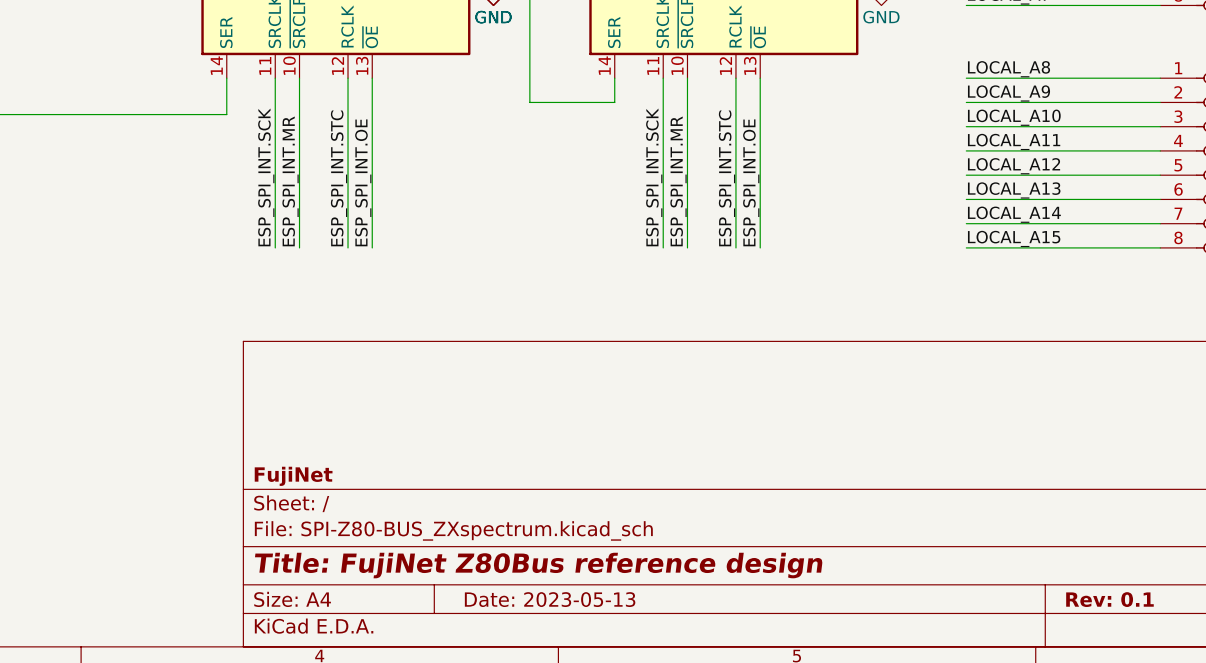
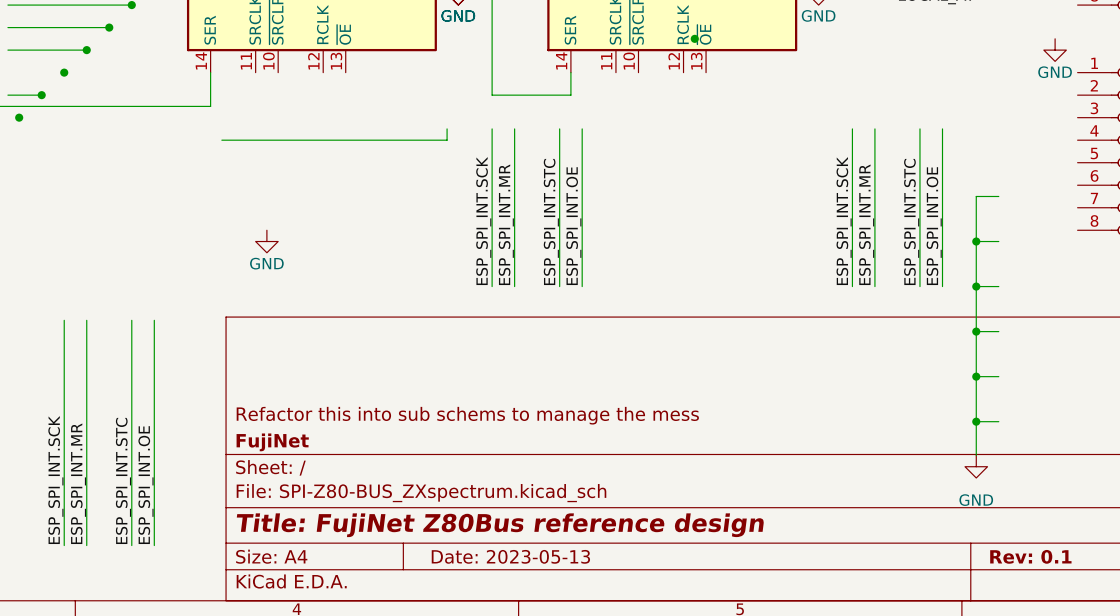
wire: none -> (7, 5) (131, 5)
junction: none -> (131, 5)
wire: (966, 5) (1160, 5) -> none
wire: none -> (7, 27) (109, 27)
junction: none -> (109, 27)
junction: none -> (694, 38)
wire: none -> (7, 50) (86, 50)
junction: none -> (86, 50)
power symbol: none -> GND (1055, 50)
label: LOCAL_A8 (1009, 69) -> none
junction: none -> (64, 72)
wire: (275, 78) (275, 247) -> none
wire: (299, 78) (299, 247) -> (492, 128) (492, 286)
wire: (348, 78) (348, 247) -> (514, 128) (514, 286)
wire: (372, 78) (372, 247) -> (559, 128) (559, 286)
wire: (663, 78) (663, 247) -> (582, 128) (582, 286)
wire: (687, 78) (687, 247) -> (852, 128) (852, 286)
wire: (735, 78) (735, 247) -> (874, 128) (874, 286)
wire: (760, 78) (760, 247) -> (919, 128) (919, 286)
wire: (966, 78) (1160, 78) -> none
label: LOCAL_A9 (1008, 93) -> none
wire: none -> (7, 95) (41, 95)
junction: none -> (41, 95)
wire: (966, 102) (1160, 102) -> none
label: LOCAL_A10 (1014, 117) -> none
junction: none -> (19, 117)
wire: (966, 126) (1160, 126) -> none
wire: none -> (447, 128) (447, 140) (221, 140)
wire: none -> (942, 128) (942, 286)
label: LOCAL_A11 (1014, 141) -> none
wire: (966, 150) (1160, 150) -> none
label: LOCAL_A12 (1014, 166) -> none
wire: (966, 175) (1160, 175) -> none
label: ESP_SPI_INT.SCK (266, 177) -> none
label: ESP_SPI_INT.SCK (654, 177) -> none
label: ESP_SPI_INT.STC (339, 178) -> none
label: ESP_SPI_INT.STC (727, 178) -> none
label: ESP_SPI_INT.MR (290, 181) -> none
label: ESP_SPI_INT.MR (678, 181) -> none
label: ESP_SPI_INT.OE (363, 182) -> none
label: ESP_SPI_INT.OE (751, 182) -> none
label: LOCAL_A13 (1014, 190) -> none
wire: (966, 199) (1160, 199) -> none
wire: none -> (998, 196) (976, 196) (976, 455)
label: LOCAL_A14 (1014, 214) -> none
wire: (966, 223) (1160, 223) -> none
label: none -> ESP_SPI_INT.SCK (483, 221)
label: none -> ESP_SPI_INT.SCK (844, 221)
label: LOCAL_A15 (1014, 238) -> none
label: none -> ESP_SPI_INT.STC (551, 221)
label: none -> ESP_SPI_INT.STC (911, 221)
label: none -> ESP_SPI_INT.MR (506, 224)
label: none -> ESP_SPI_INT.MR (866, 224)
label: none -> ESP_SPI_INT.OE (573, 226)
label: none -> ESP_SPI_INT.OE (934, 226)
wire: (966, 247) (1160, 247) -> none
power symbol: none -> GND (266, 241)
wire: none -> (976, 241) (998, 241)
junction: none -> (976, 241)
wire: none -> (976, 286) (998, 286)
junction: none -> (976, 286)
wire: none -> (64, 320) (64, 545)
wire: none -> (86, 320) (86, 545)
wire: none -> (131, 320) (131, 545)
wire: none -> (154, 320) (154, 545)
wire: none -> (976, 331) (998, 331)
junction: none -> (976, 331)
wire: none -> (976, 376) (998, 376)
junction: none -> (976, 376)
title block: none -> Refactor this into sub schems to manage the mess (467, 415)
wire: none -> (976, 421) (998, 421)
junction: none -> (976, 421)
power symbol: none -> GND (976, 466)
label: none -> ESP_SPI_INT.SCK (55, 480)
label: none -> ESP_SPI_INT.STC (123, 480)
label: none -> ESP_SPI_INT.MR (78, 483)
label: none -> ESP_SPI_INT.OE (145, 485)

